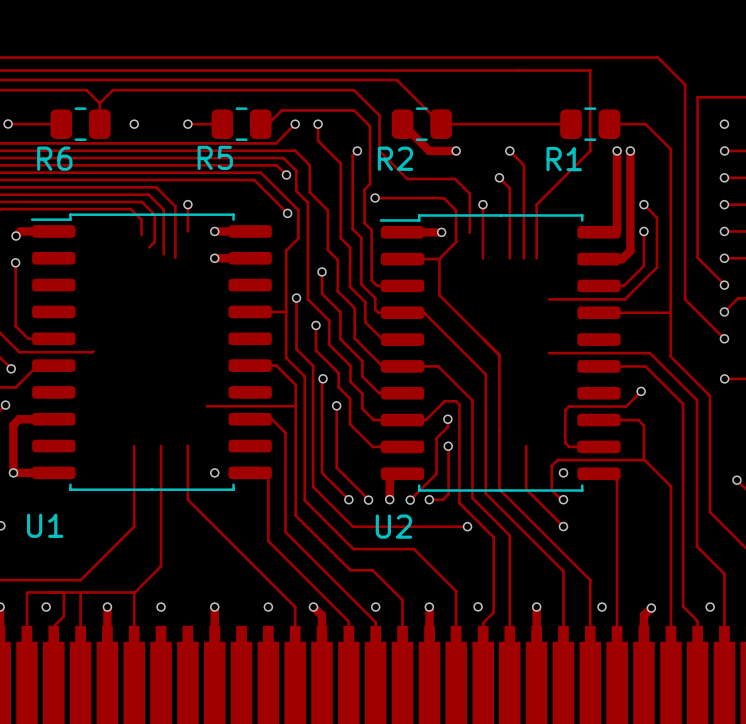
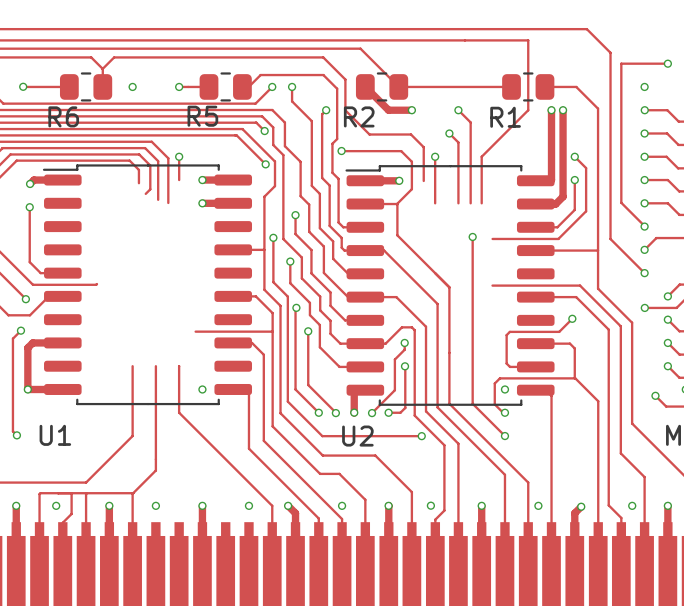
track: none -> (472, 236) (472, 366)
via: none -> (472, 236)

